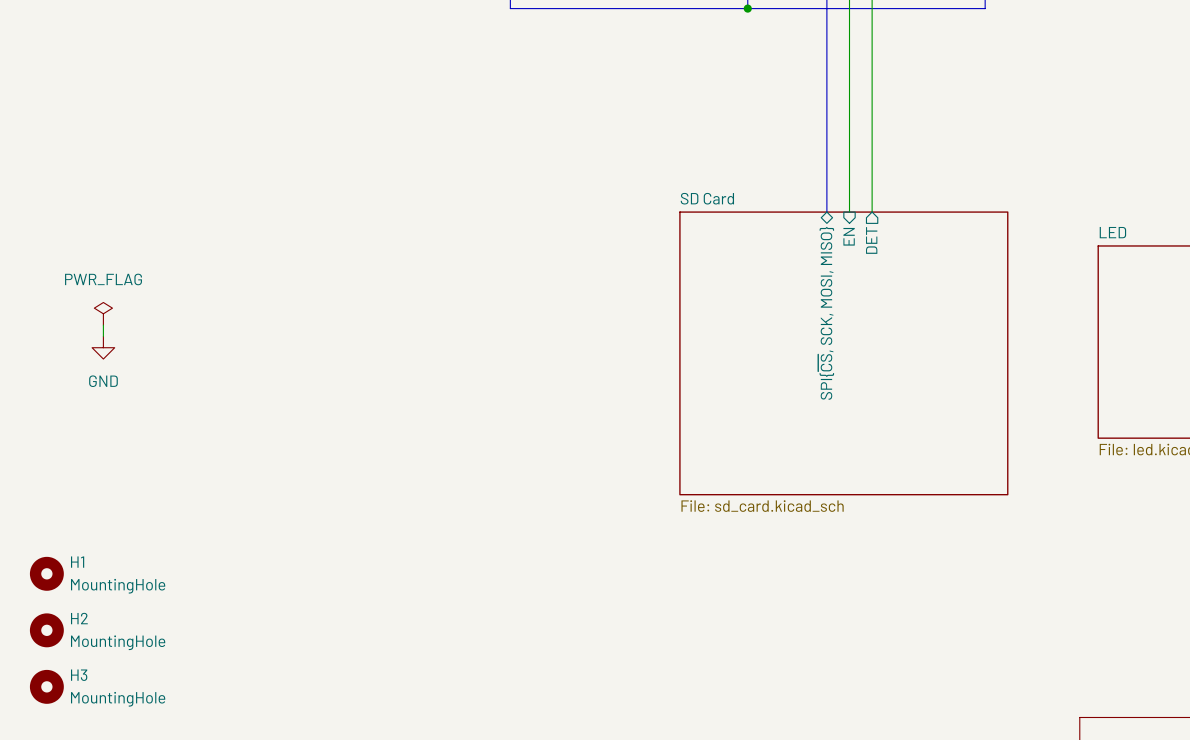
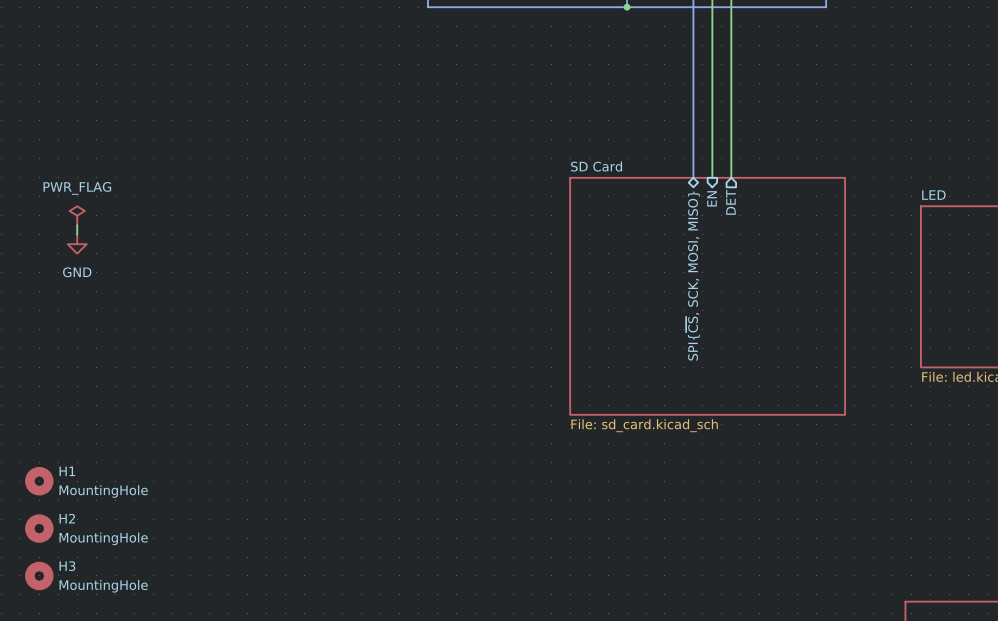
power symbol position: PWR_FLAG (103, 313) -> PWR_FLAG (77, 215)
wire: (103, 325) (103, 336) -> (77, 225) (77, 234)
power symbol position: GND (103, 347) -> GND (77, 244)

